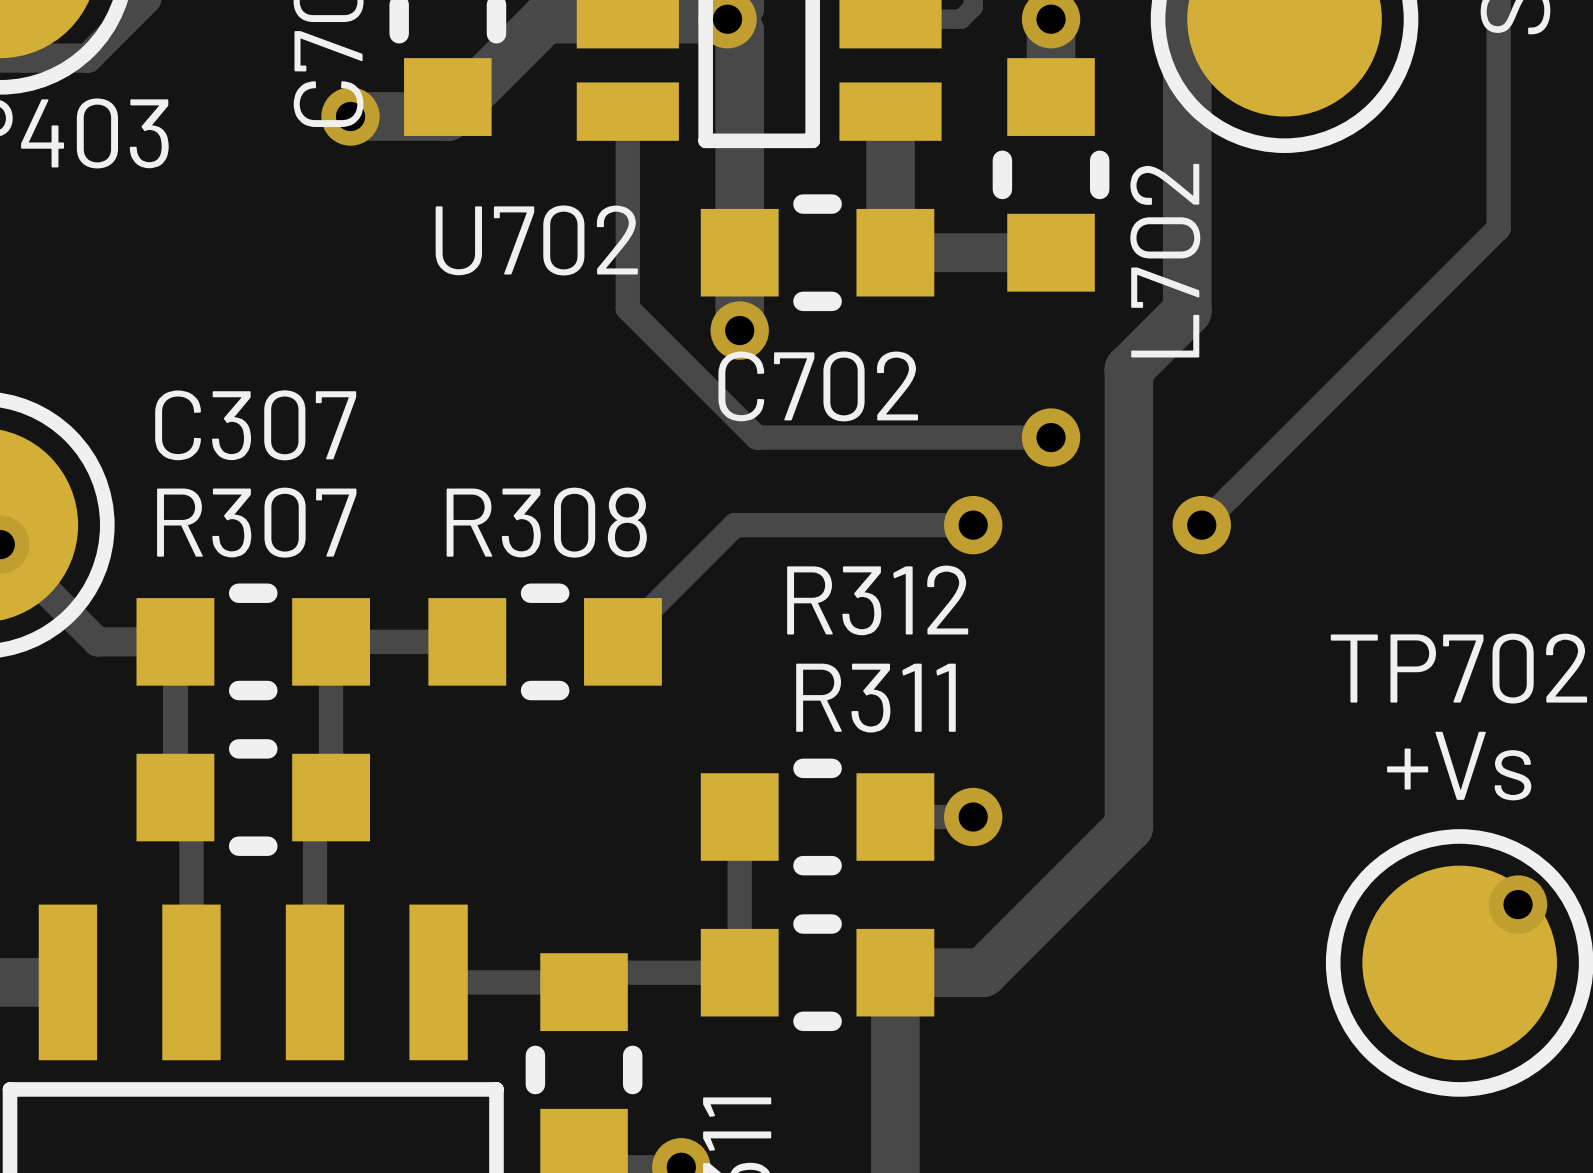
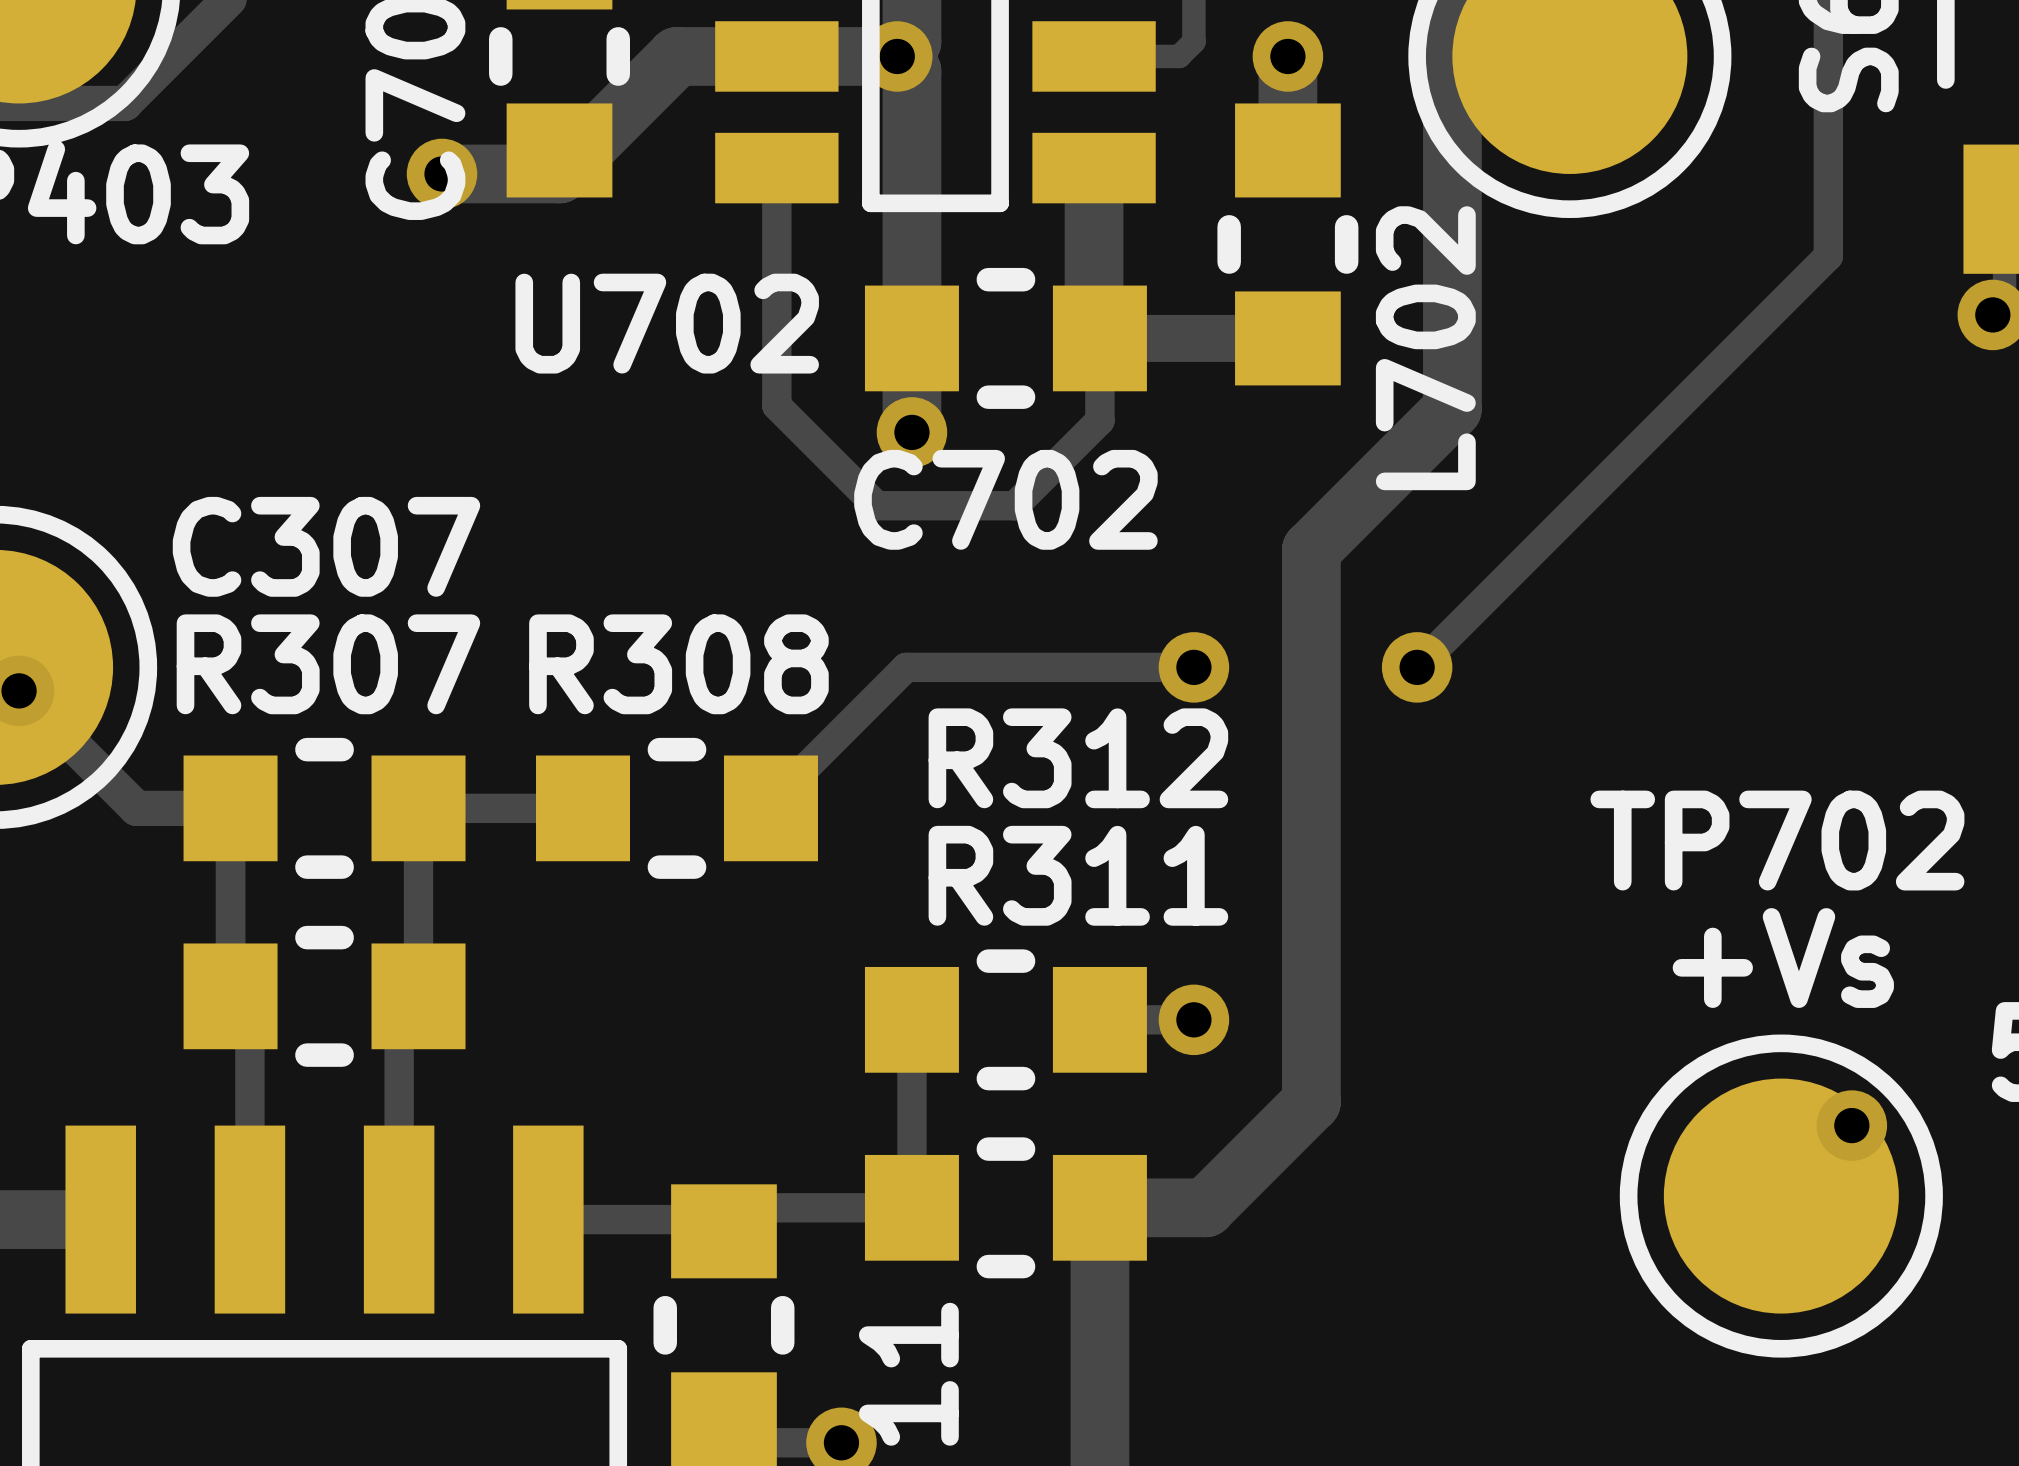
track: (1498, 184) (1498, 228) (1201, 525) -> (1828, 256) (1417, 667)
track: (1128, 369) (1128, 826) (1070, 885) -> (1381, 479) (1311, 549) (1311, 1102)
track: (710, 391) (756, 437) (1051, 437) -> (876, 505) (1014, 505) (1099, 420) (1099, 338)
via: (1051, 437) -> none
via position: (1201, 525) -> (1417, 667)

